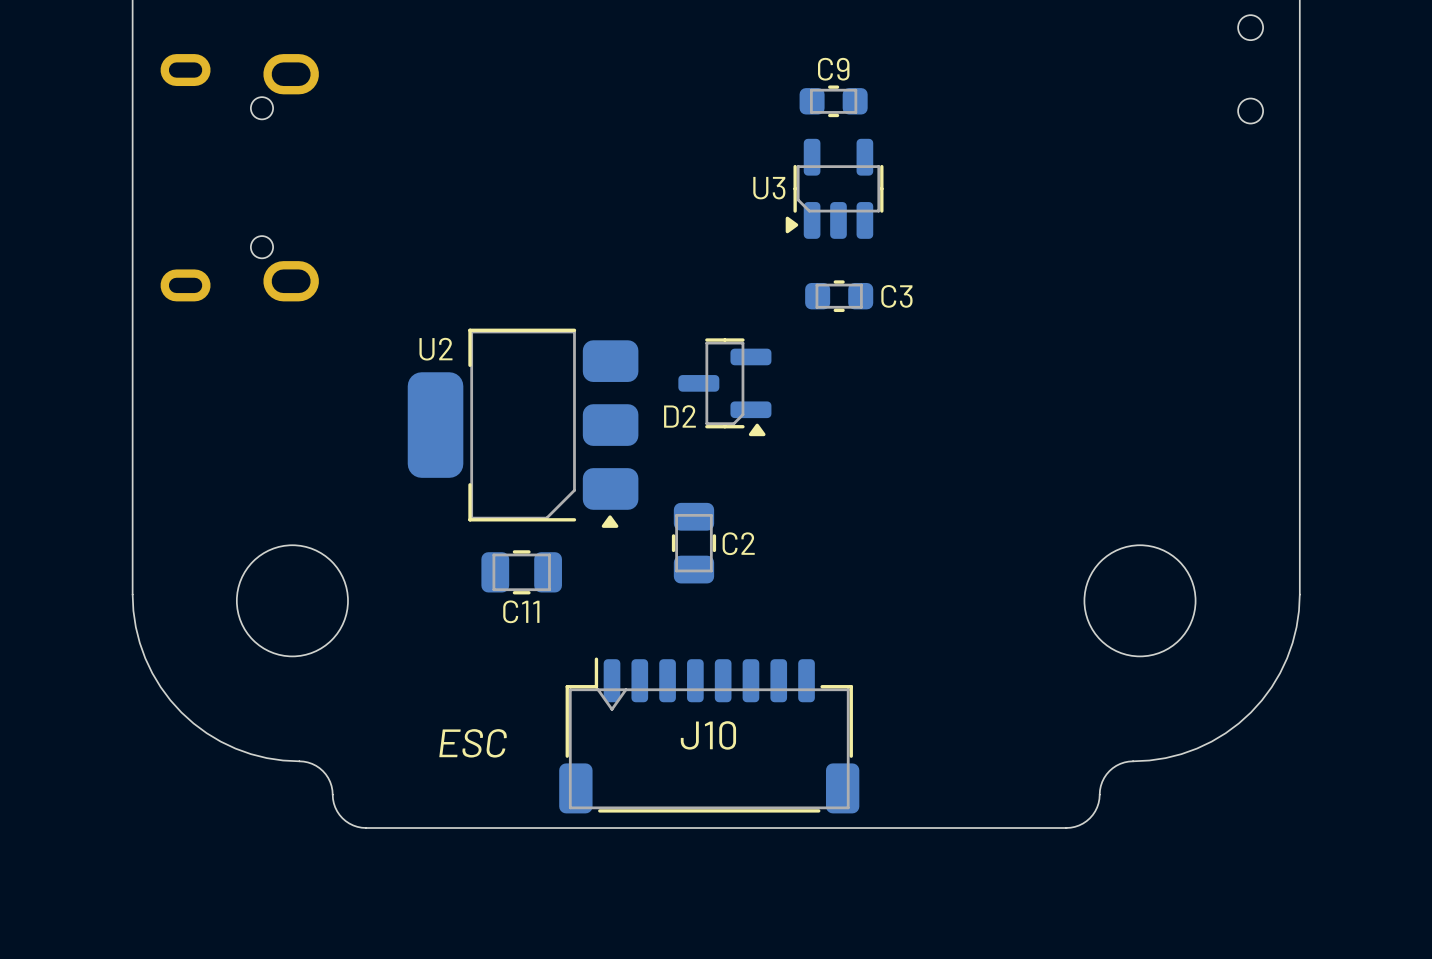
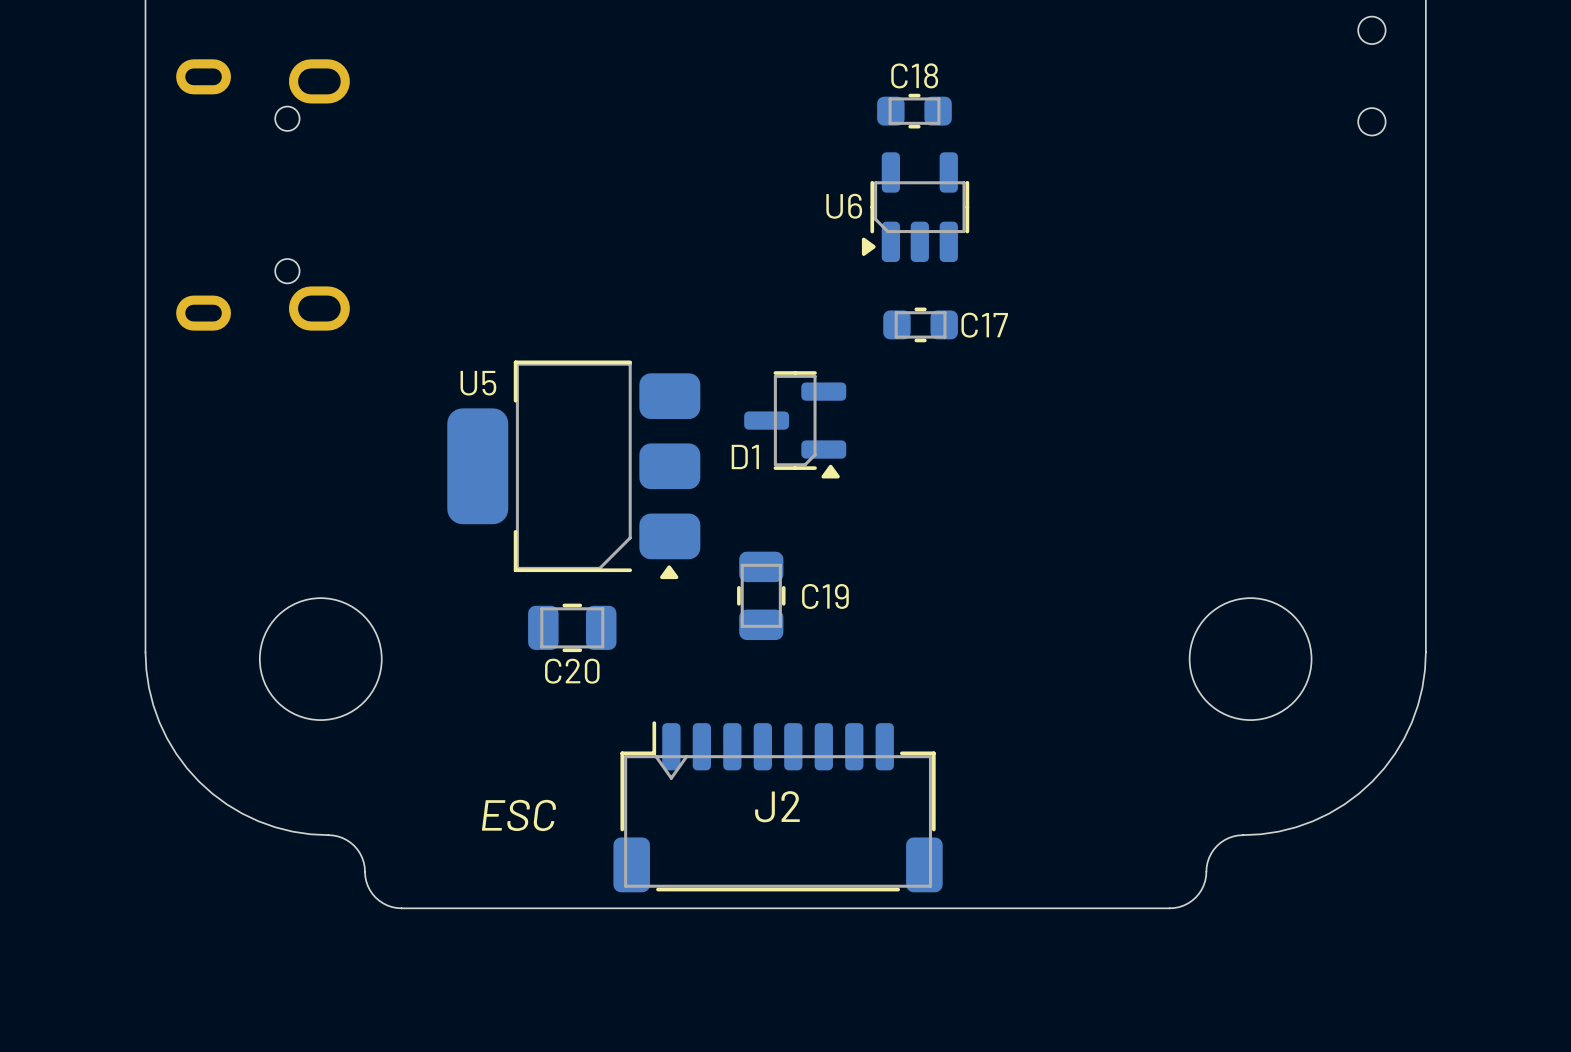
C9 name: C9 (833, 69) -> C18 (914, 75)
U3 name: U3 (769, 188) -> U6 (844, 206)
C3 name: C3 (896, 296) -> C17 (984, 325)
U2 name: U2 (435, 349) -> U5 (478, 383)
D2 name: D2 (679, 416) -> D1 (745, 456)
C2 name: C2 (738, 543) -> C19 (825, 596)
C11 name: C11 (521, 611) -> C20 (572, 671)
J10 name: J10 (708, 735) -> J2 (777, 806)

